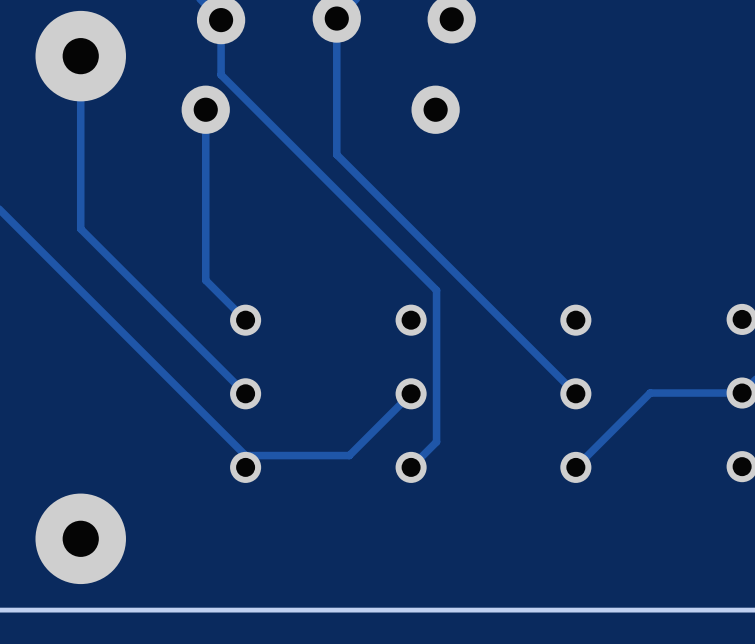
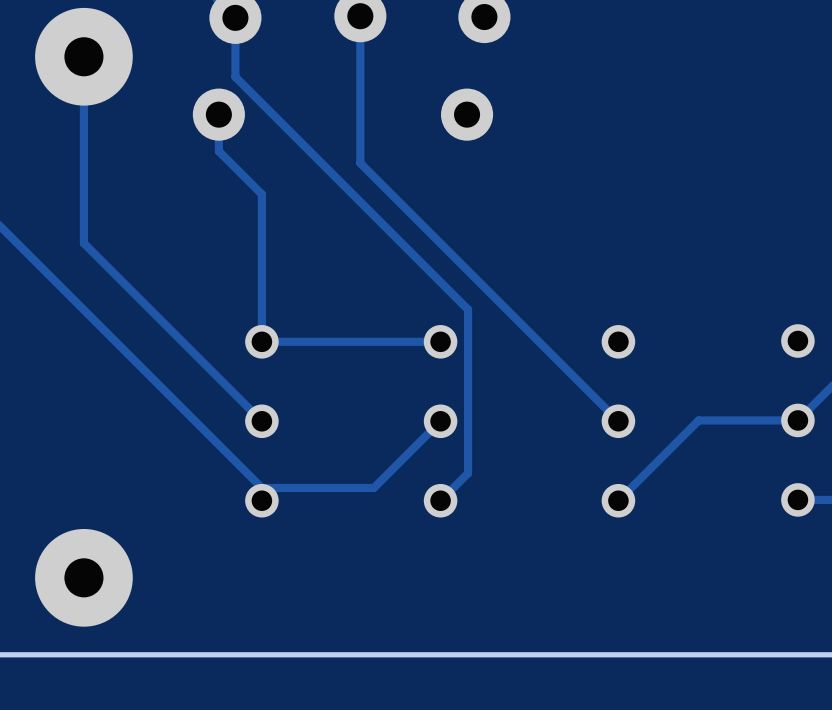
track: (205, 143) (205, 280) (245, 320) -> (218, 151) (261, 194) (261, 341) (440, 341)

